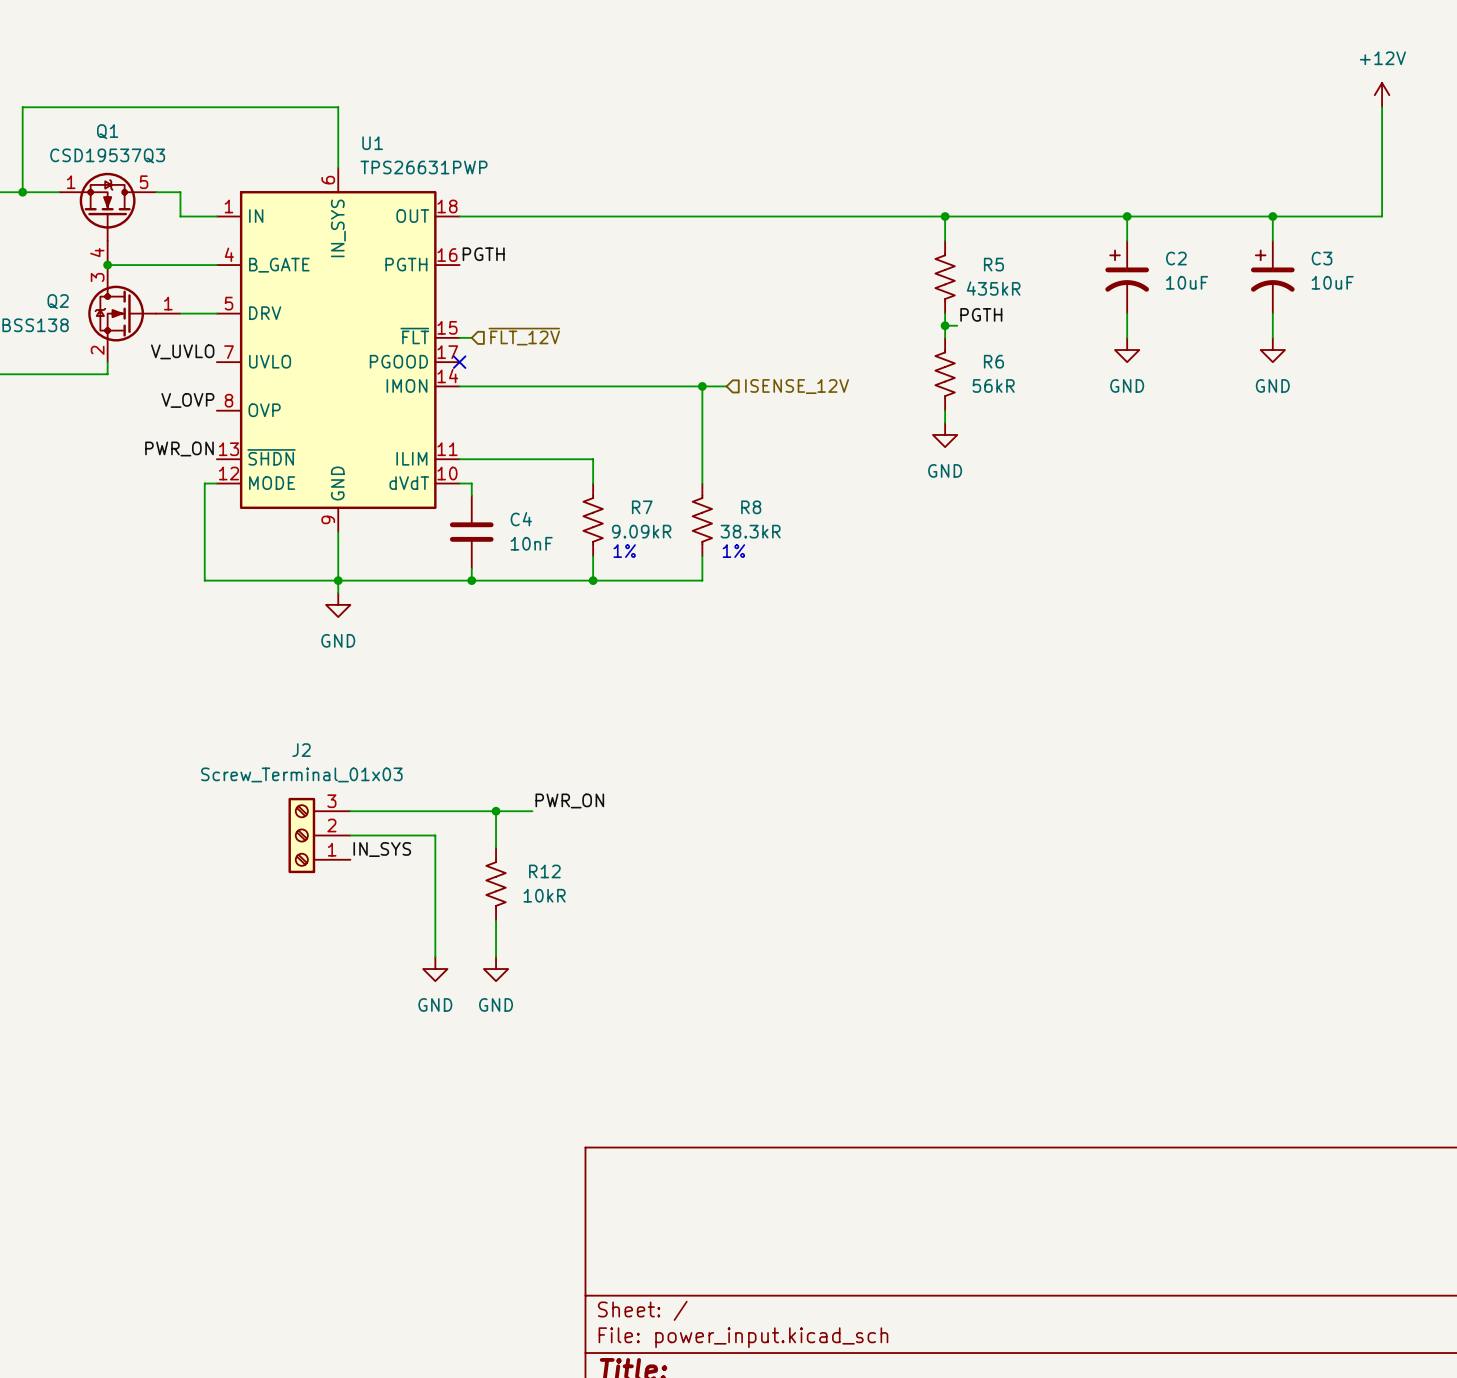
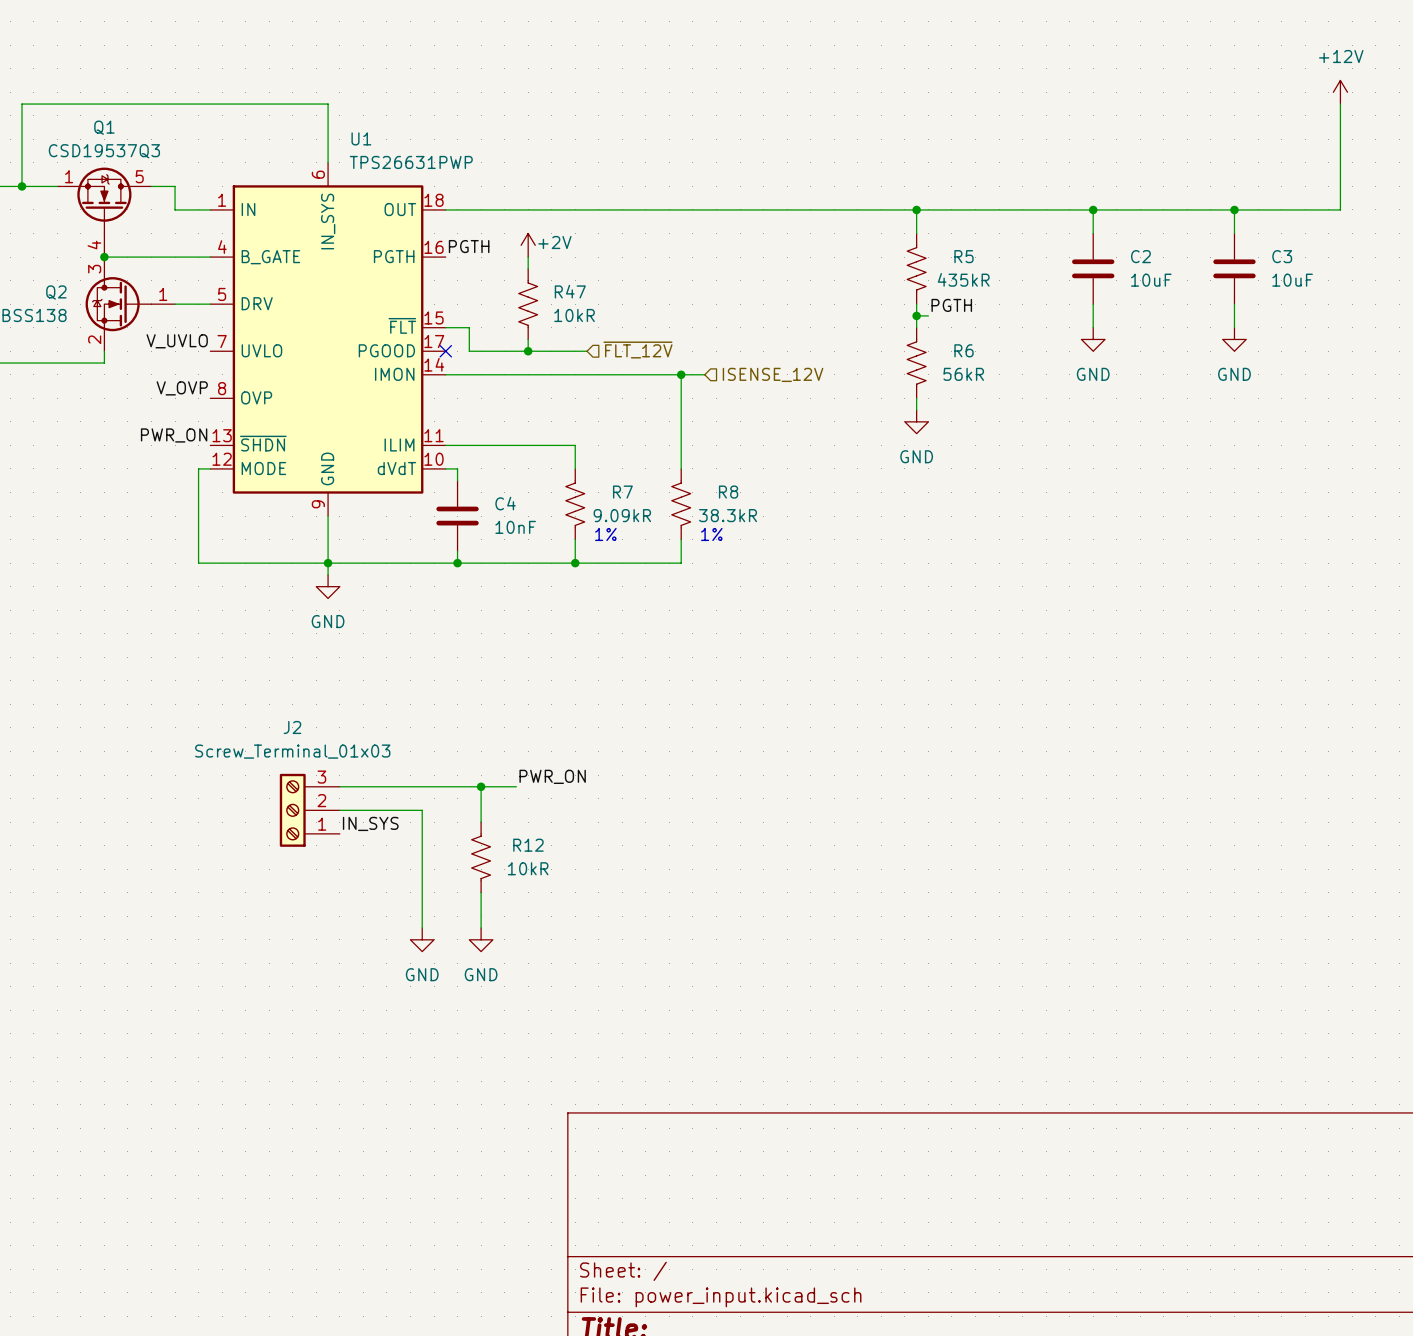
C2 symbol: [1105, 240, 1150, 314] -> [1072, 233, 1115, 305]
C3 symbol: [1250, 240, 1295, 314] -> [1213, 233, 1256, 305]
power symbol: none -> +2V (528, 245)
wire: none -> (528, 257) (528, 268)
R47: none -> 10kR (528, 304)
hierarchical label position: ~{FLT_12V} (524, 336) -> ~{FLT_12V} (637, 350)
wire: none -> (457, 327) (469, 327) (469, 351) (587, 351)
wire: none -> (528, 339) (528, 351)
junction: none -> (528, 351)

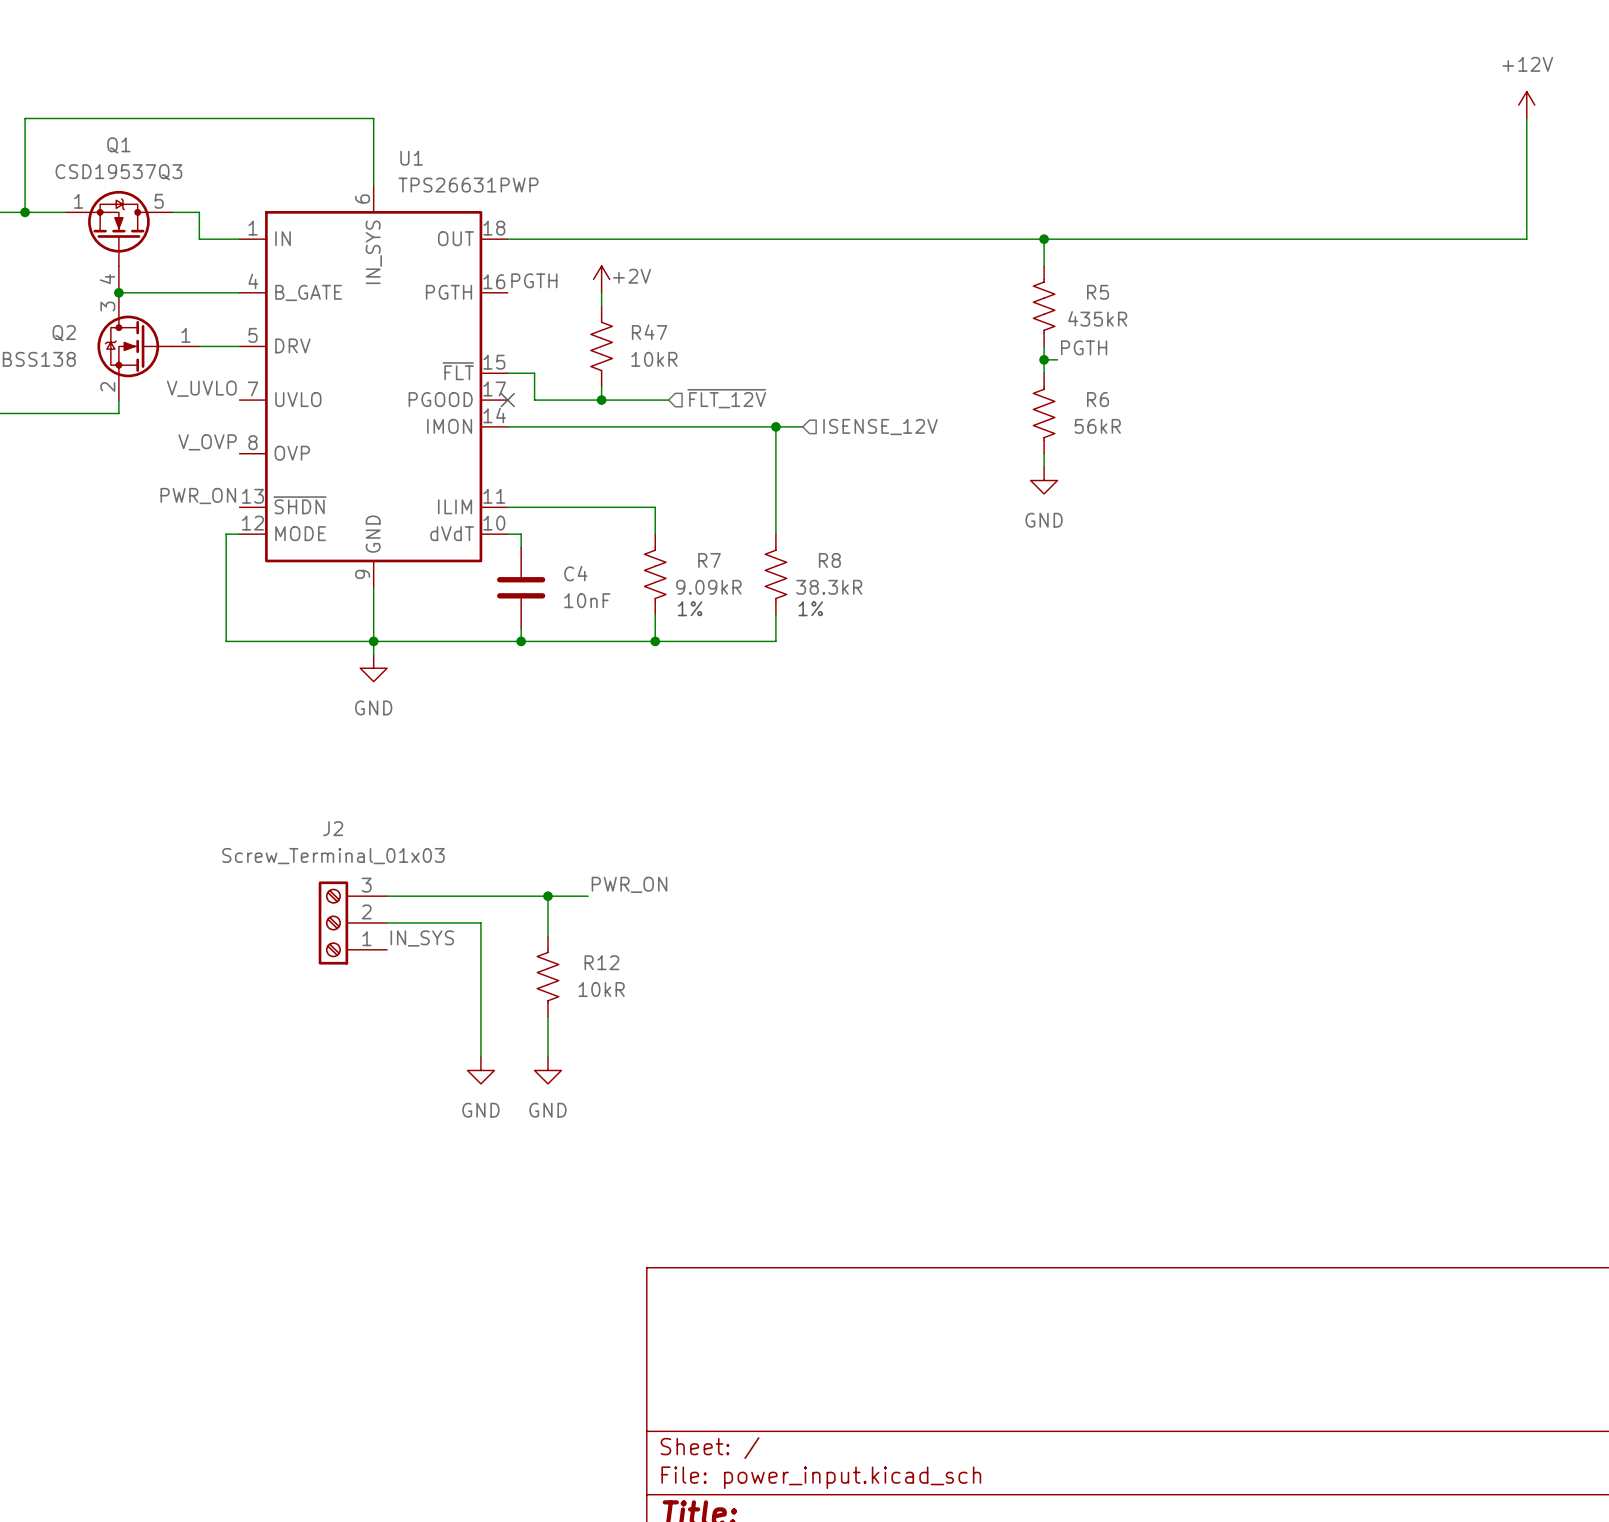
wire: (1093, 209) (1093, 233) -> none
junction: (1093, 209) -> none
wire: (1234, 209) (1234, 233) -> none
junction: (1234, 209) -> none
C2: 10uF (1093, 268) -> none
C3: 10uF (1234, 268) -> none
wire: (1093, 304) (1093, 327) -> none
wire: (1234, 304) (1234, 327) -> none
power symbol: GND (1093, 339) -> none
power symbol: GND (1234, 339) -> none

